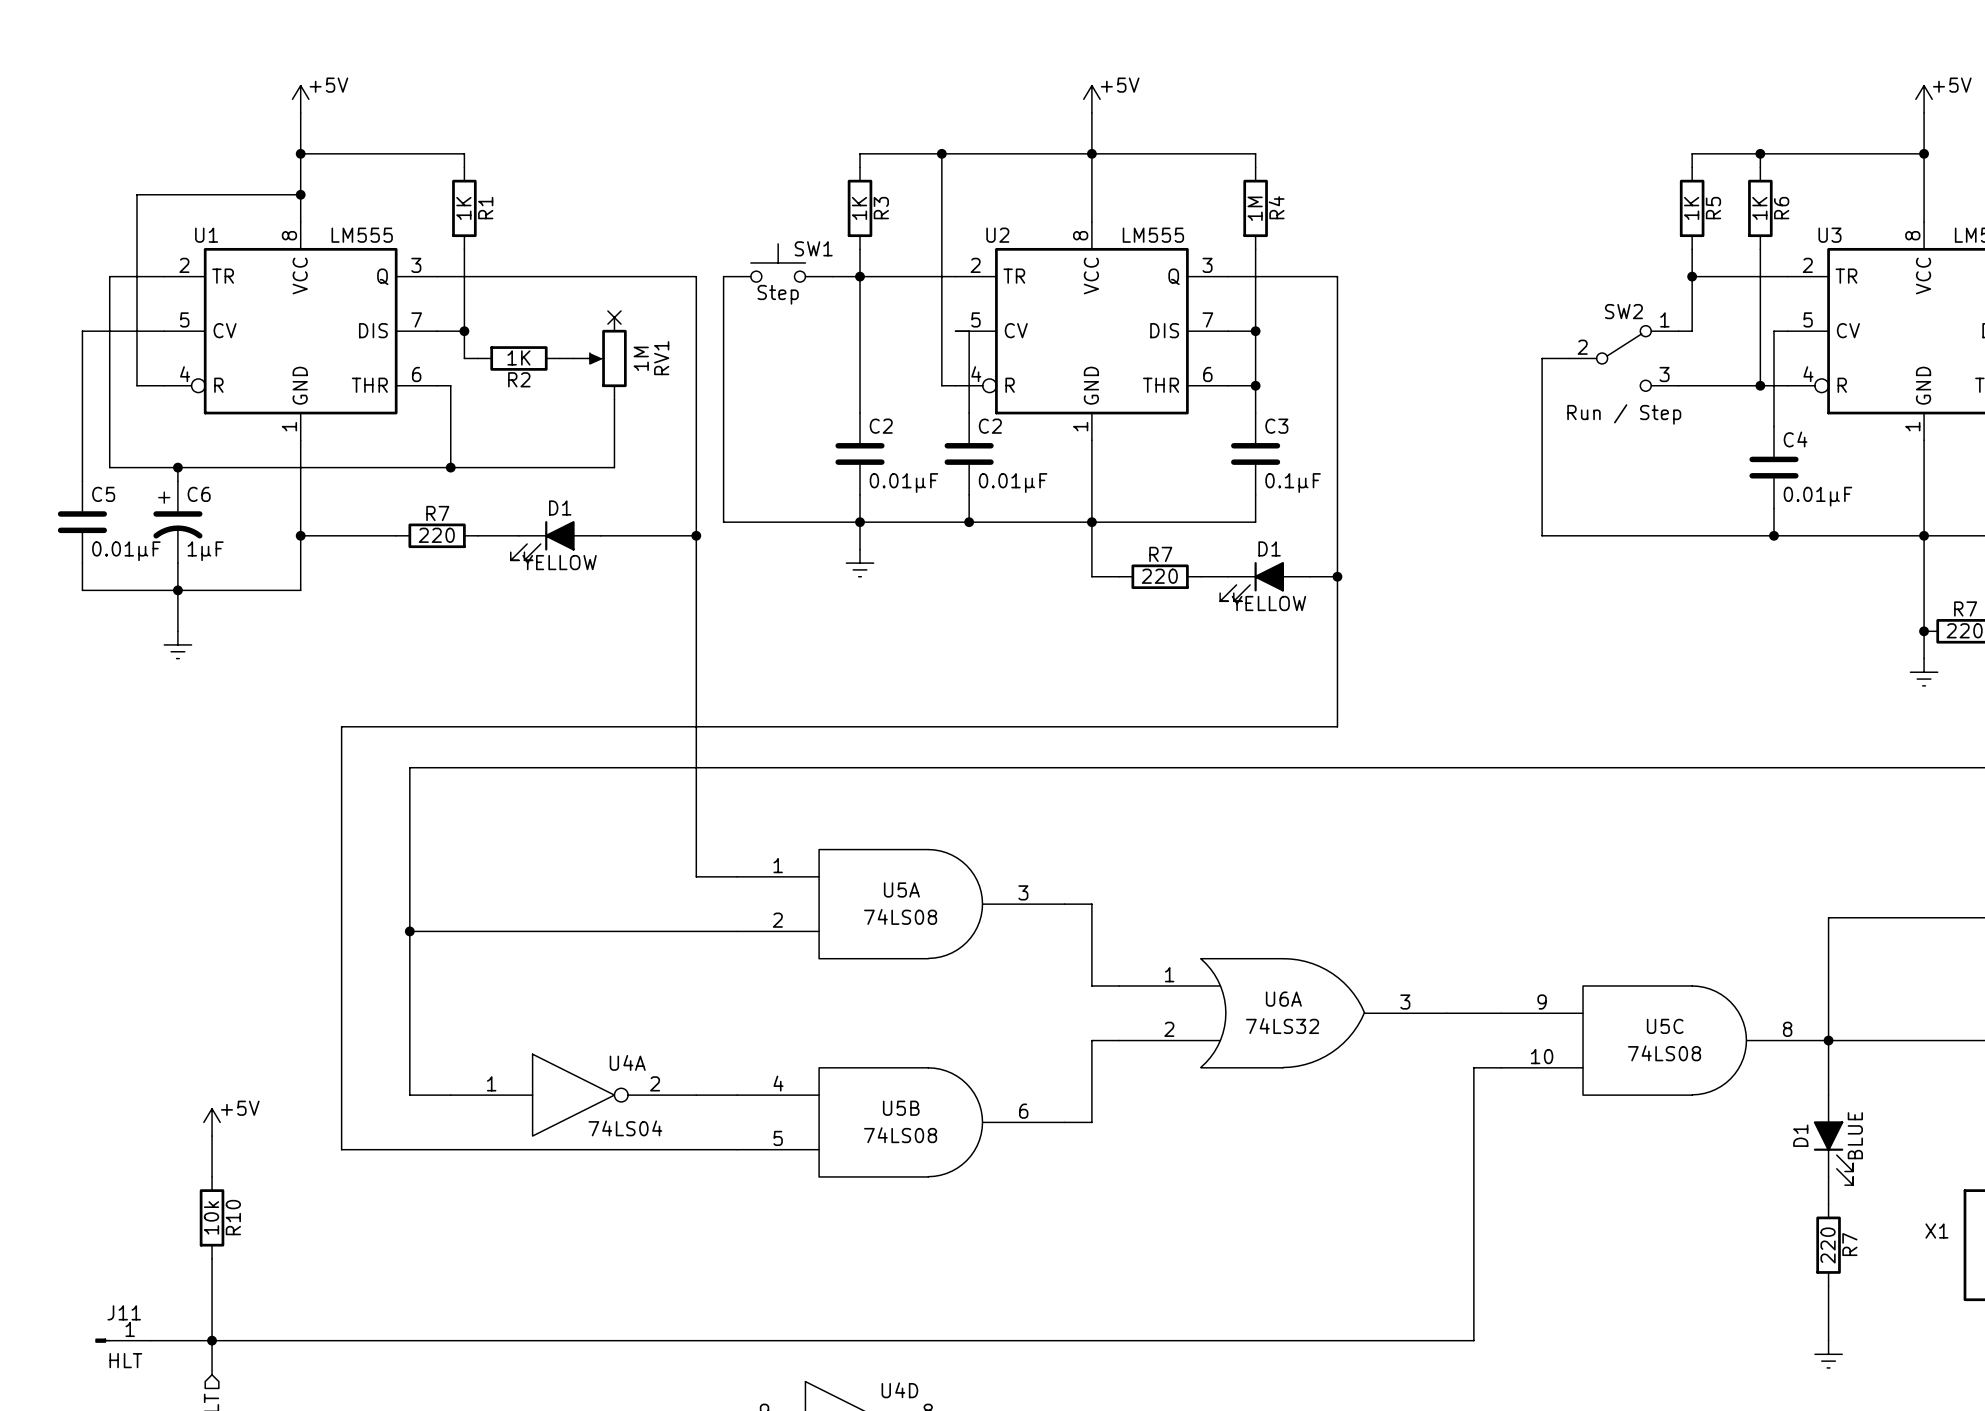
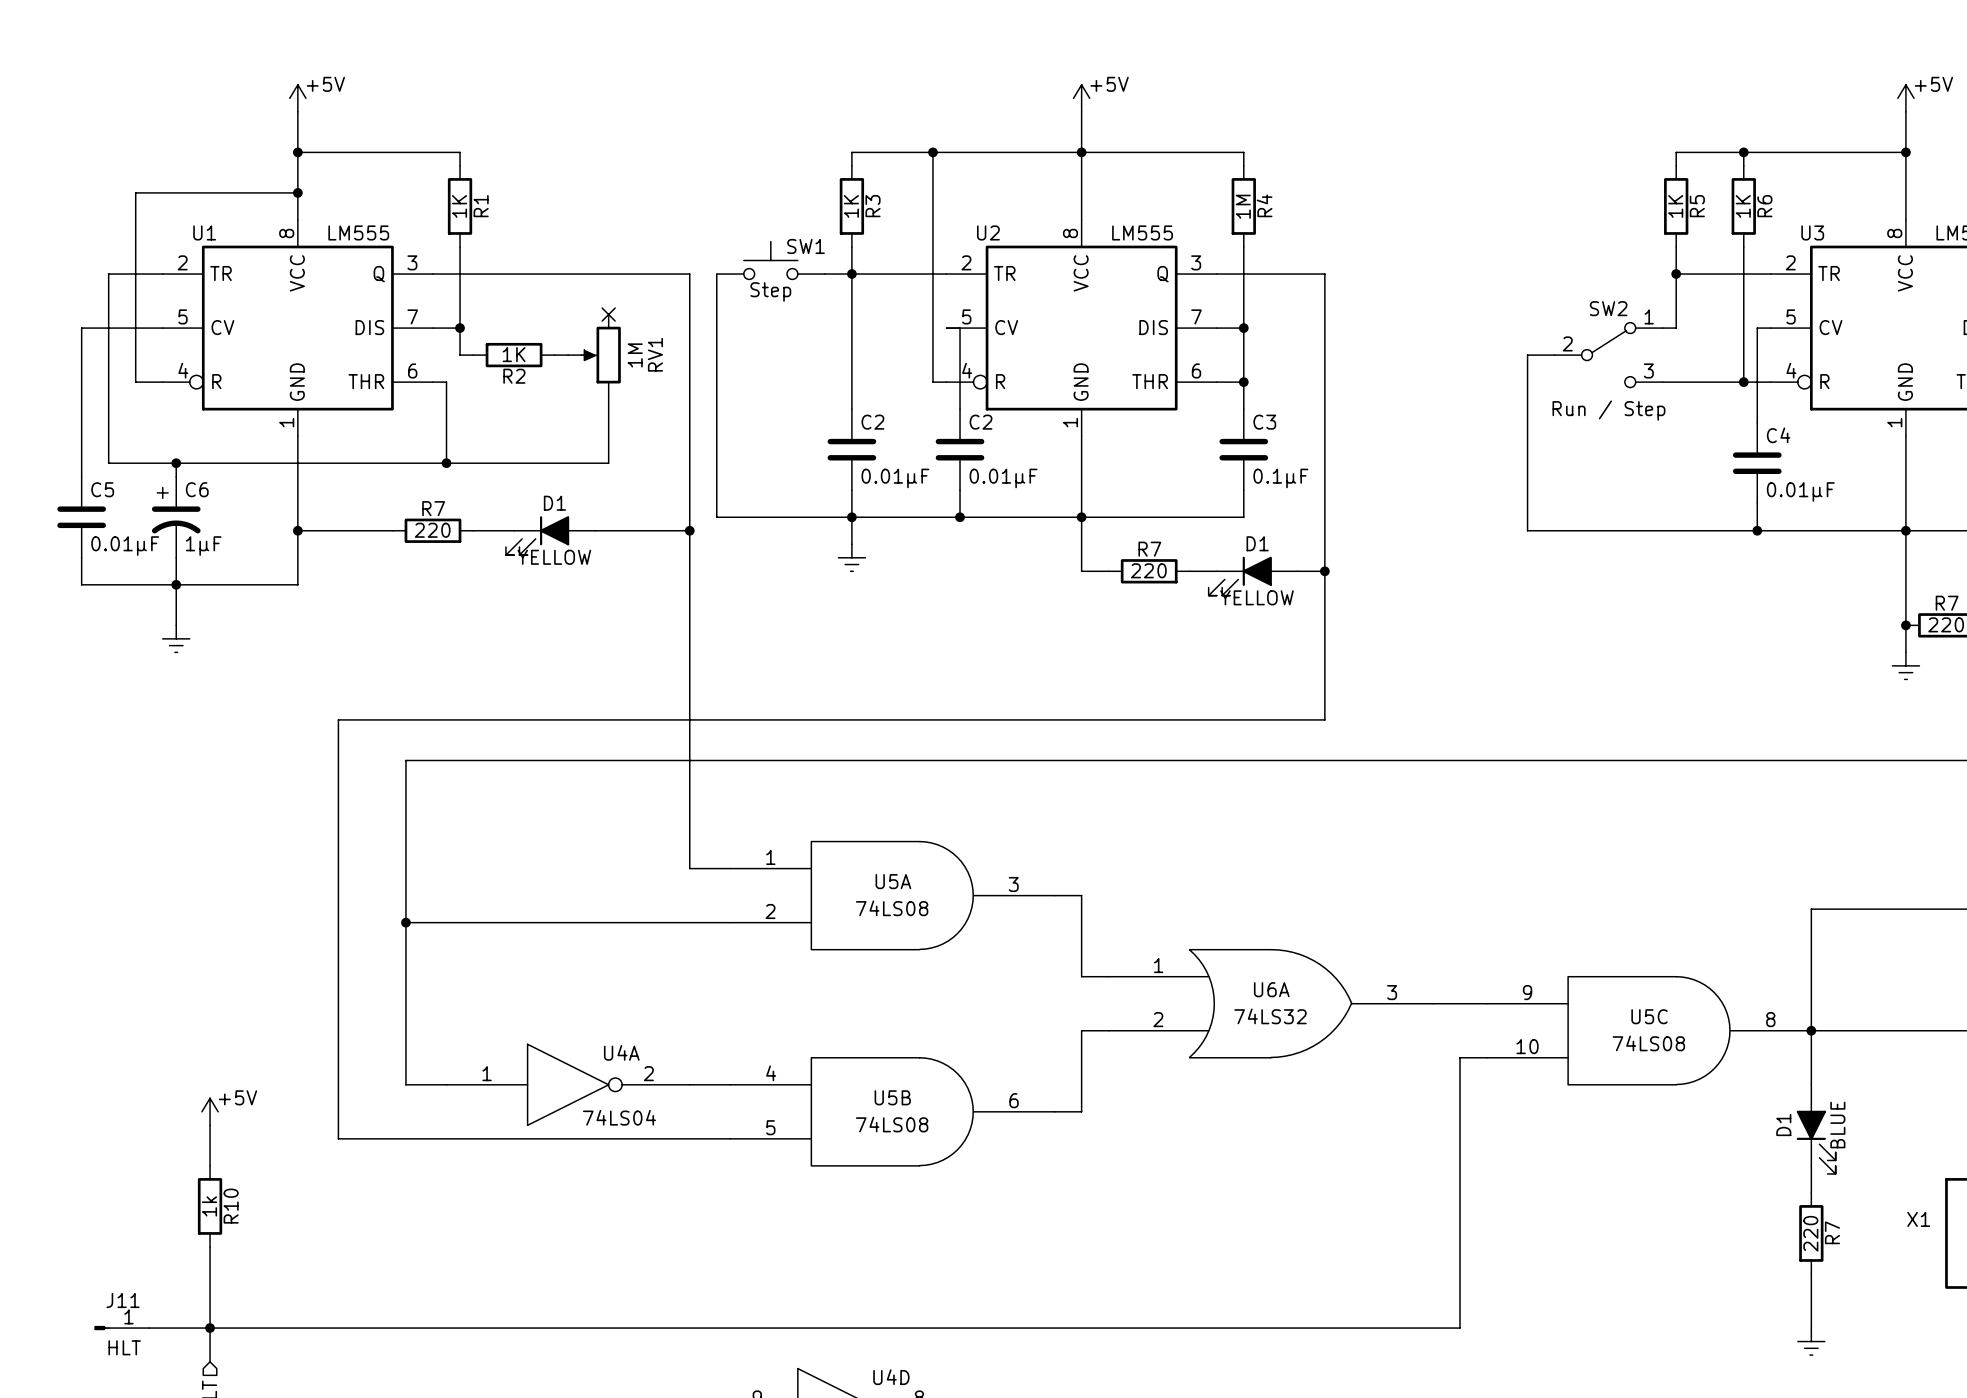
R10 value: 10k (211, 1217) -> 1k (209, 1206)

